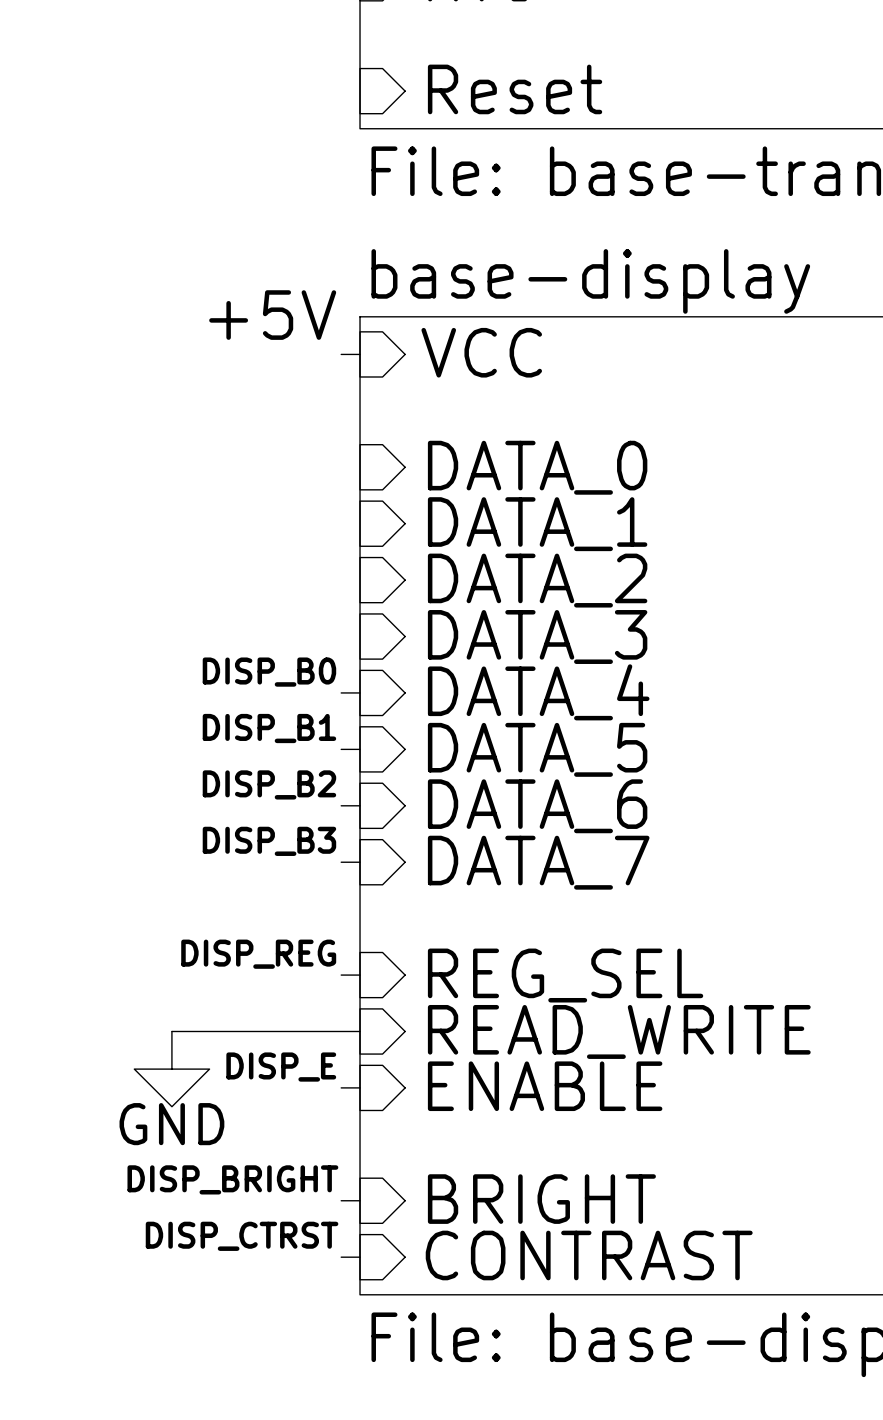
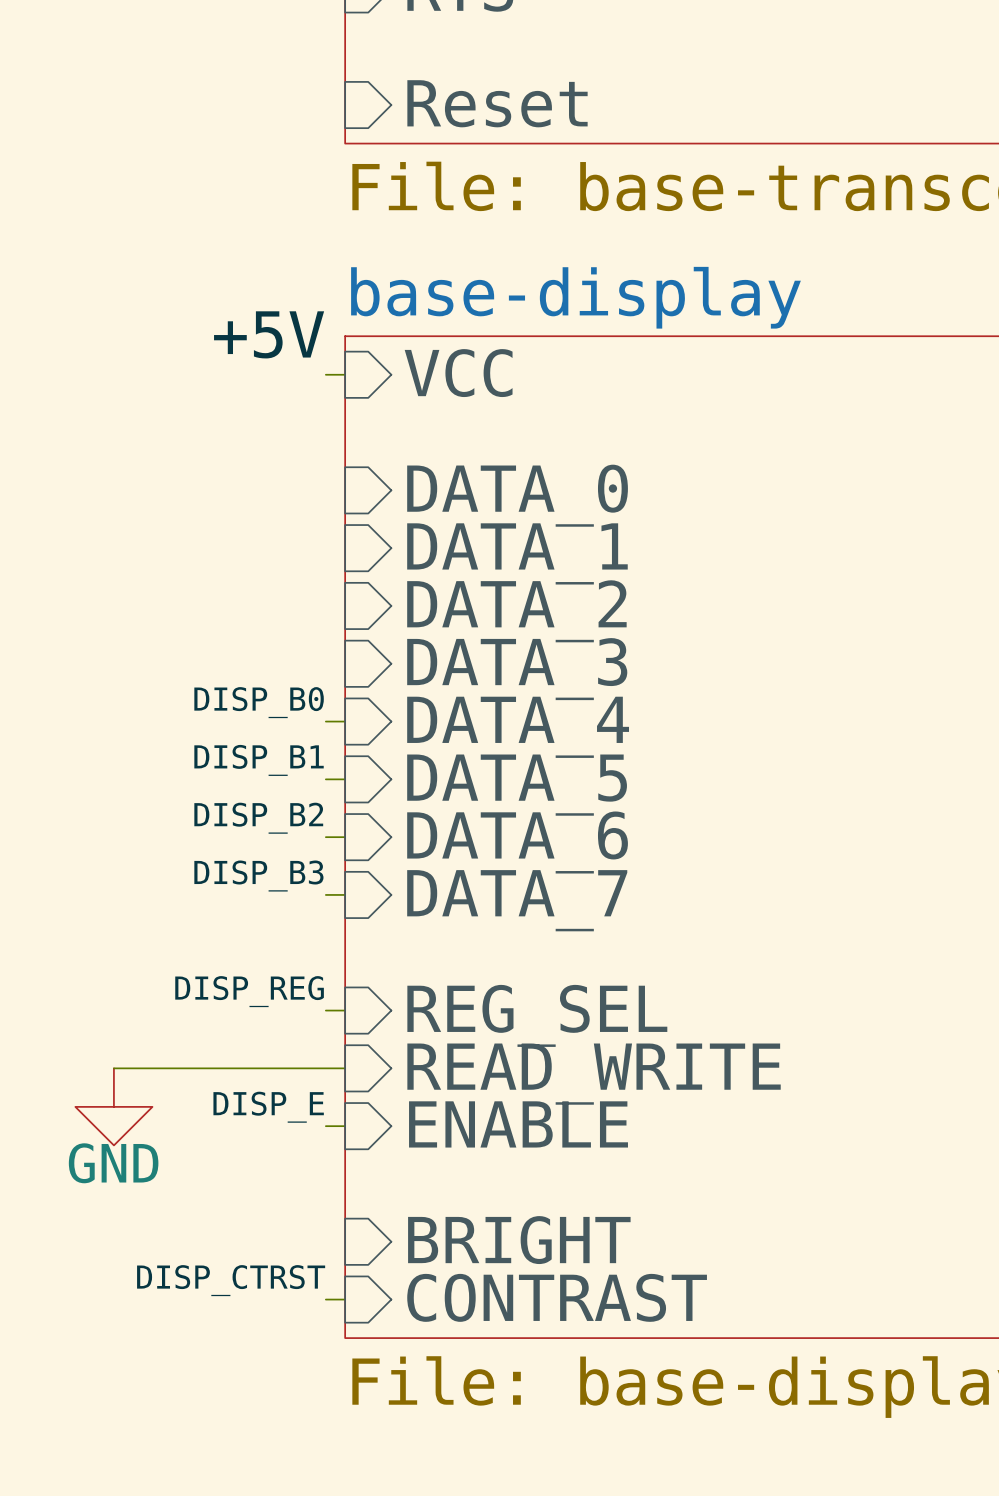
wire: none -> (113, 1068) (152, 1068)
power symbol position: GND (171, 1069) -> GND (113, 1106)
label: DISP_BRIGHT (232, 1179) -> none
wire: (341, 1200) (360, 1200) -> none

